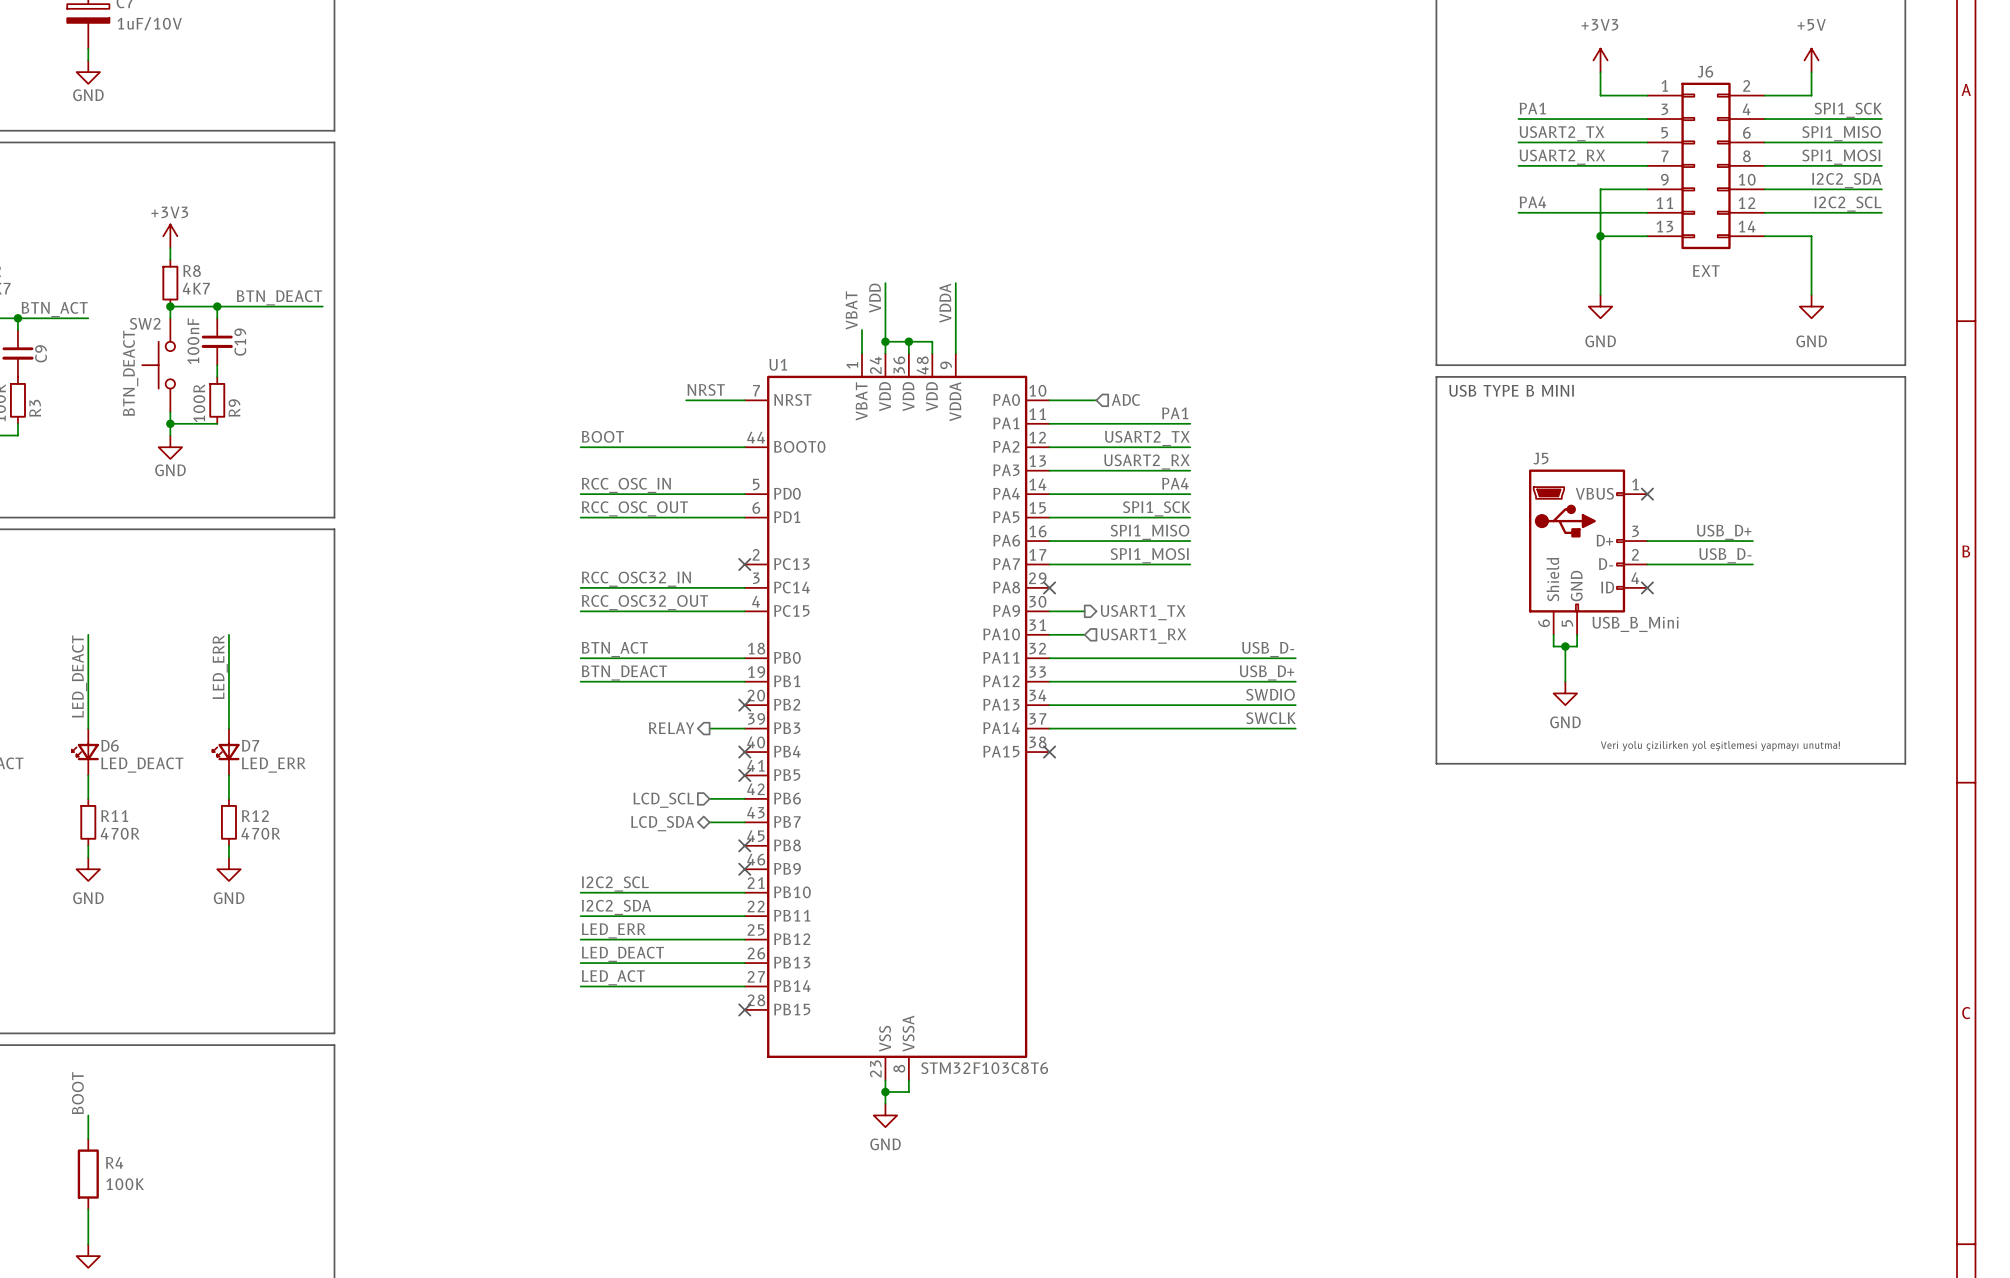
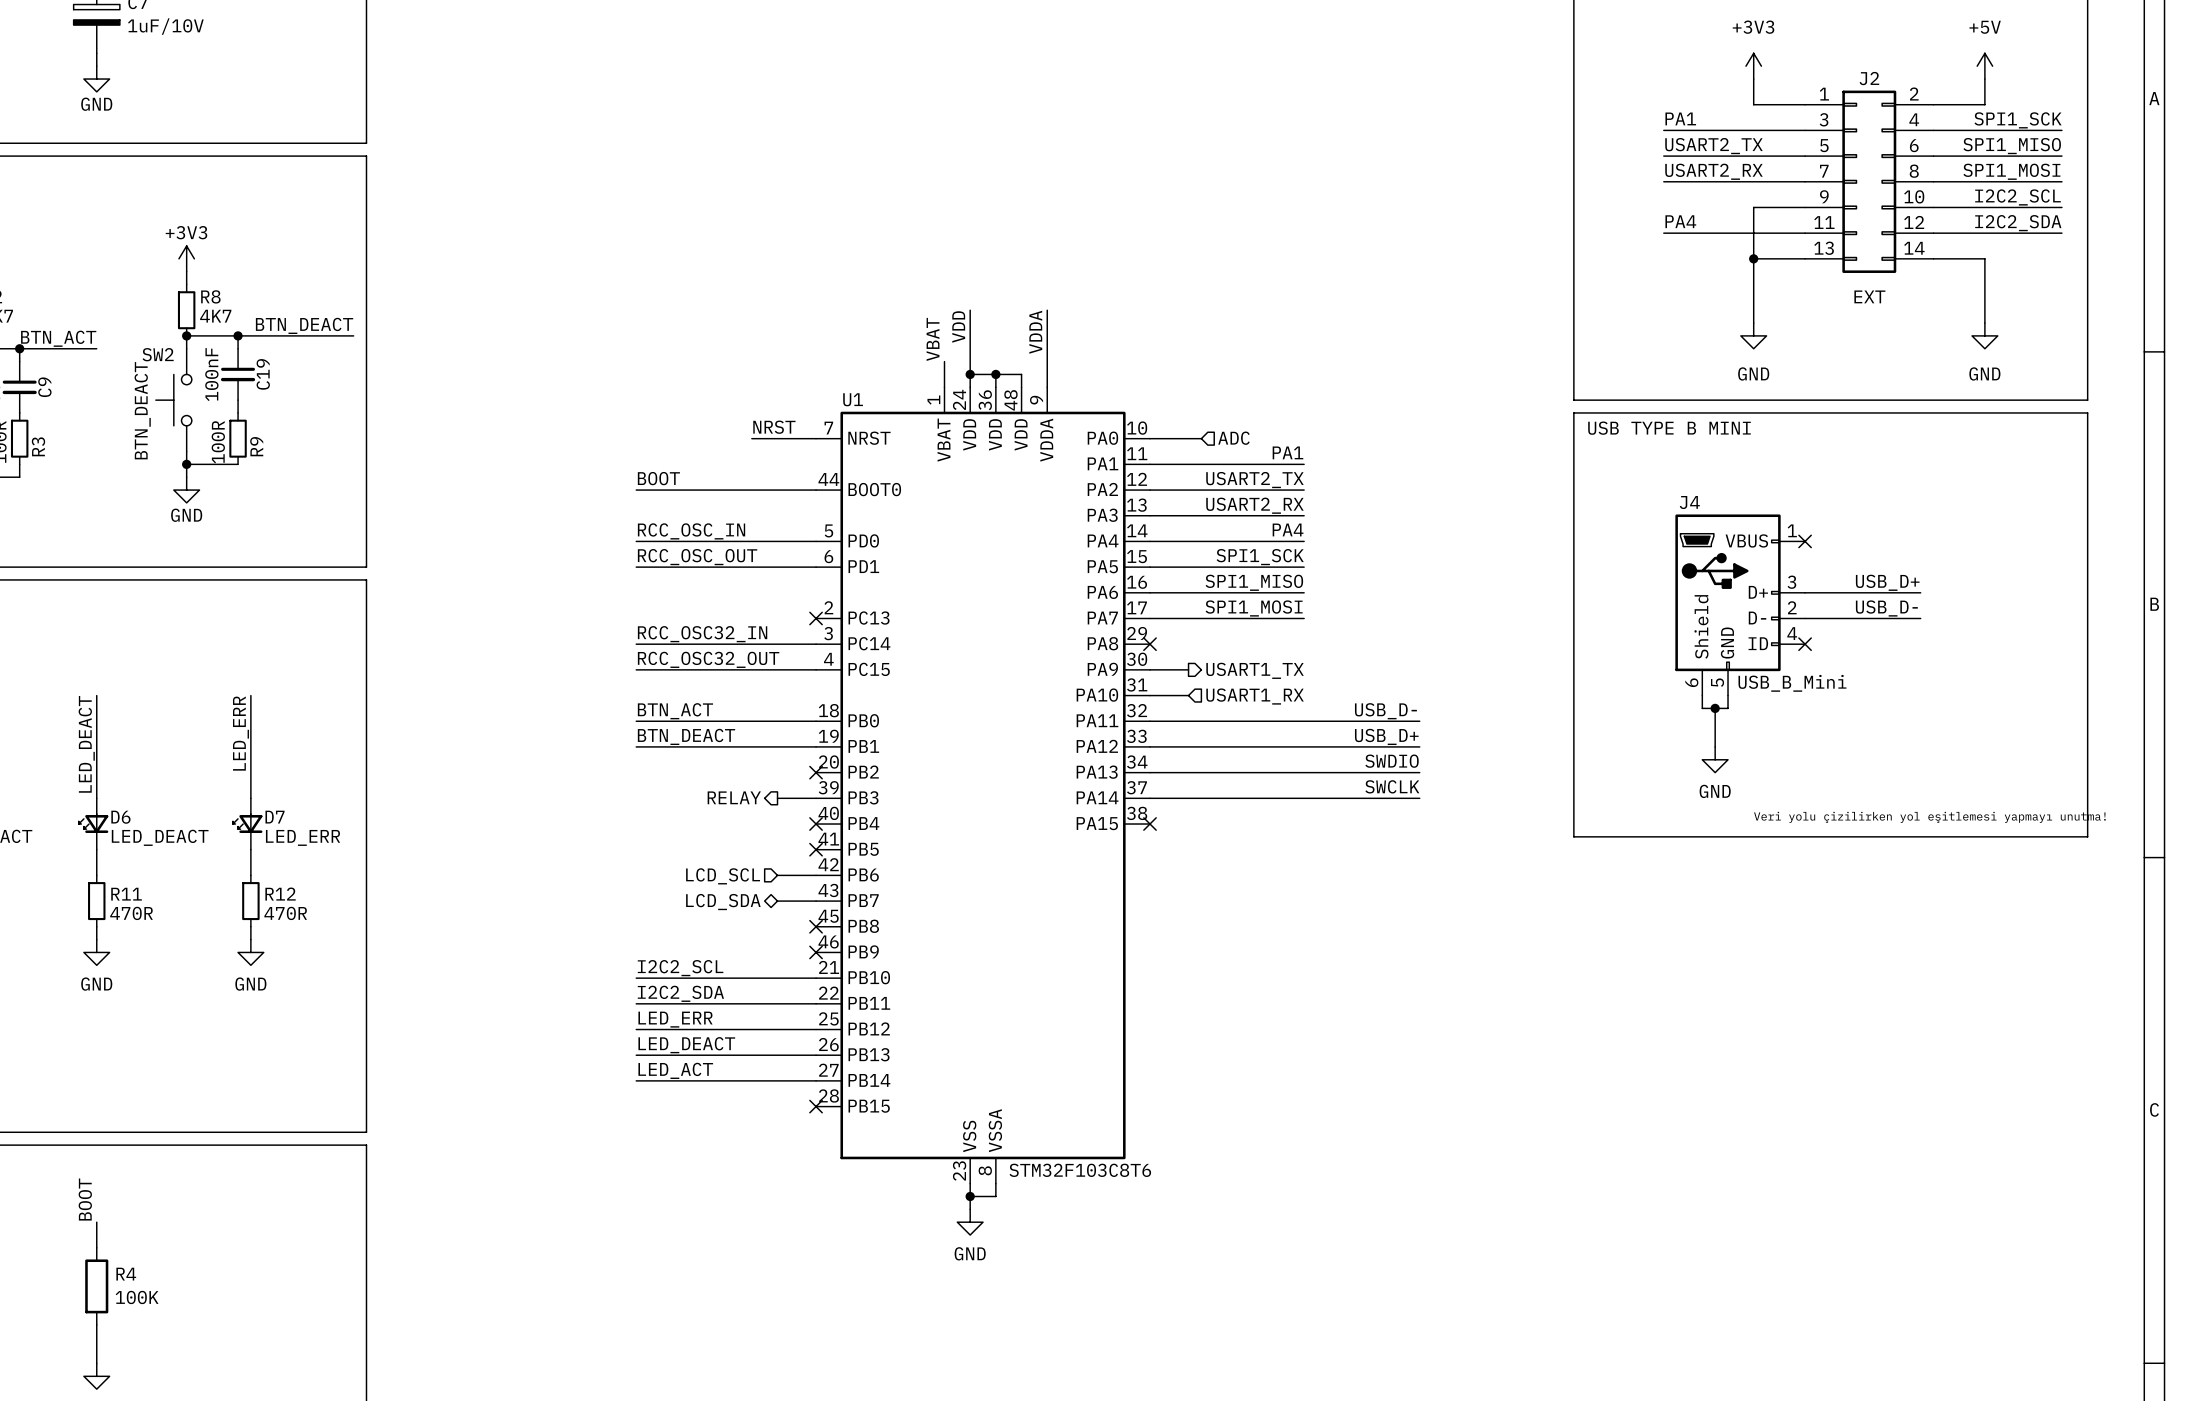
J6 name: J6 (1705, 71) -> J2 (1869, 78)
label: I2C2_SDA (1846, 180) -> I2C2_SCL (2017, 197)
label: I2C2_SCL (1847, 204) -> I2C2_SDA (2018, 223)
J5 name: J5 (1540, 458) -> J4 (1689, 502)

